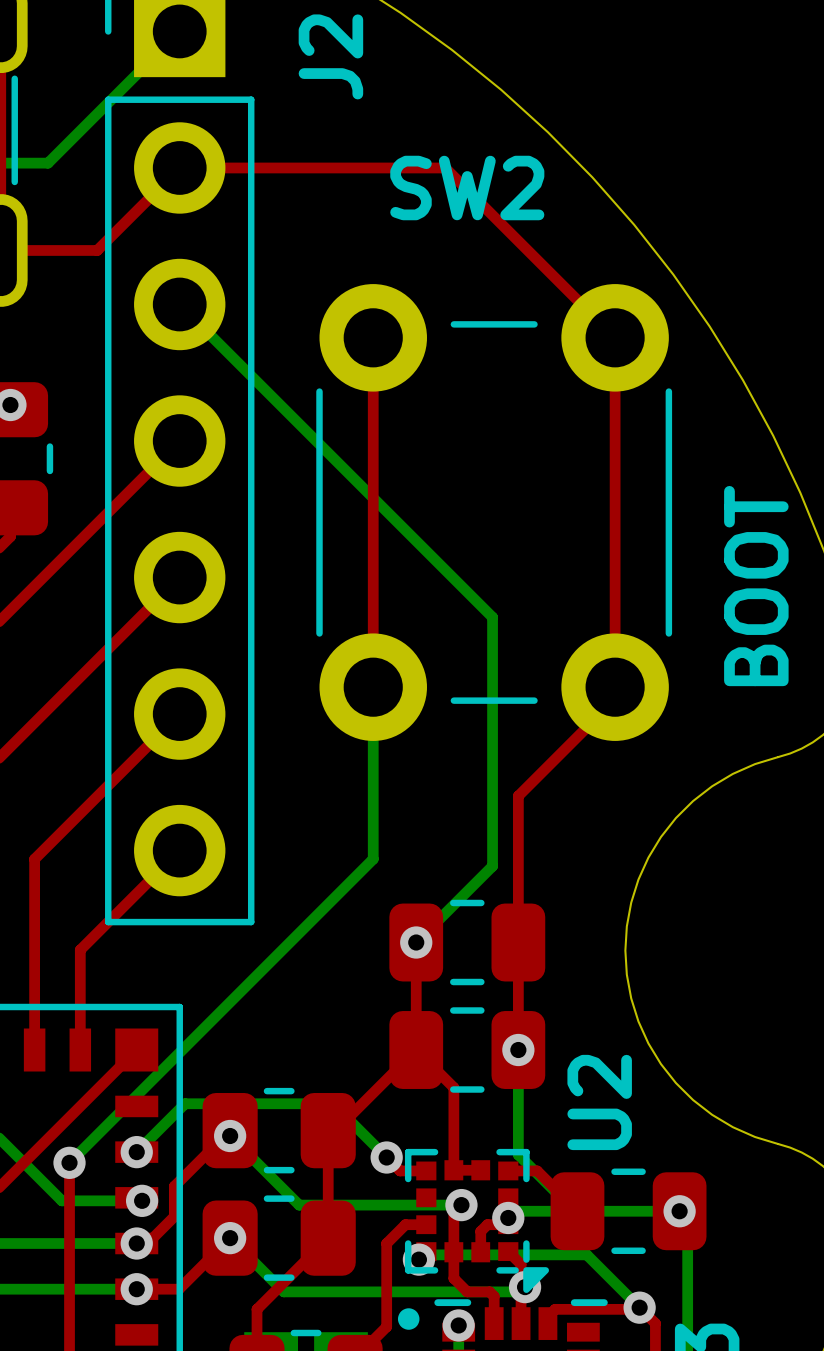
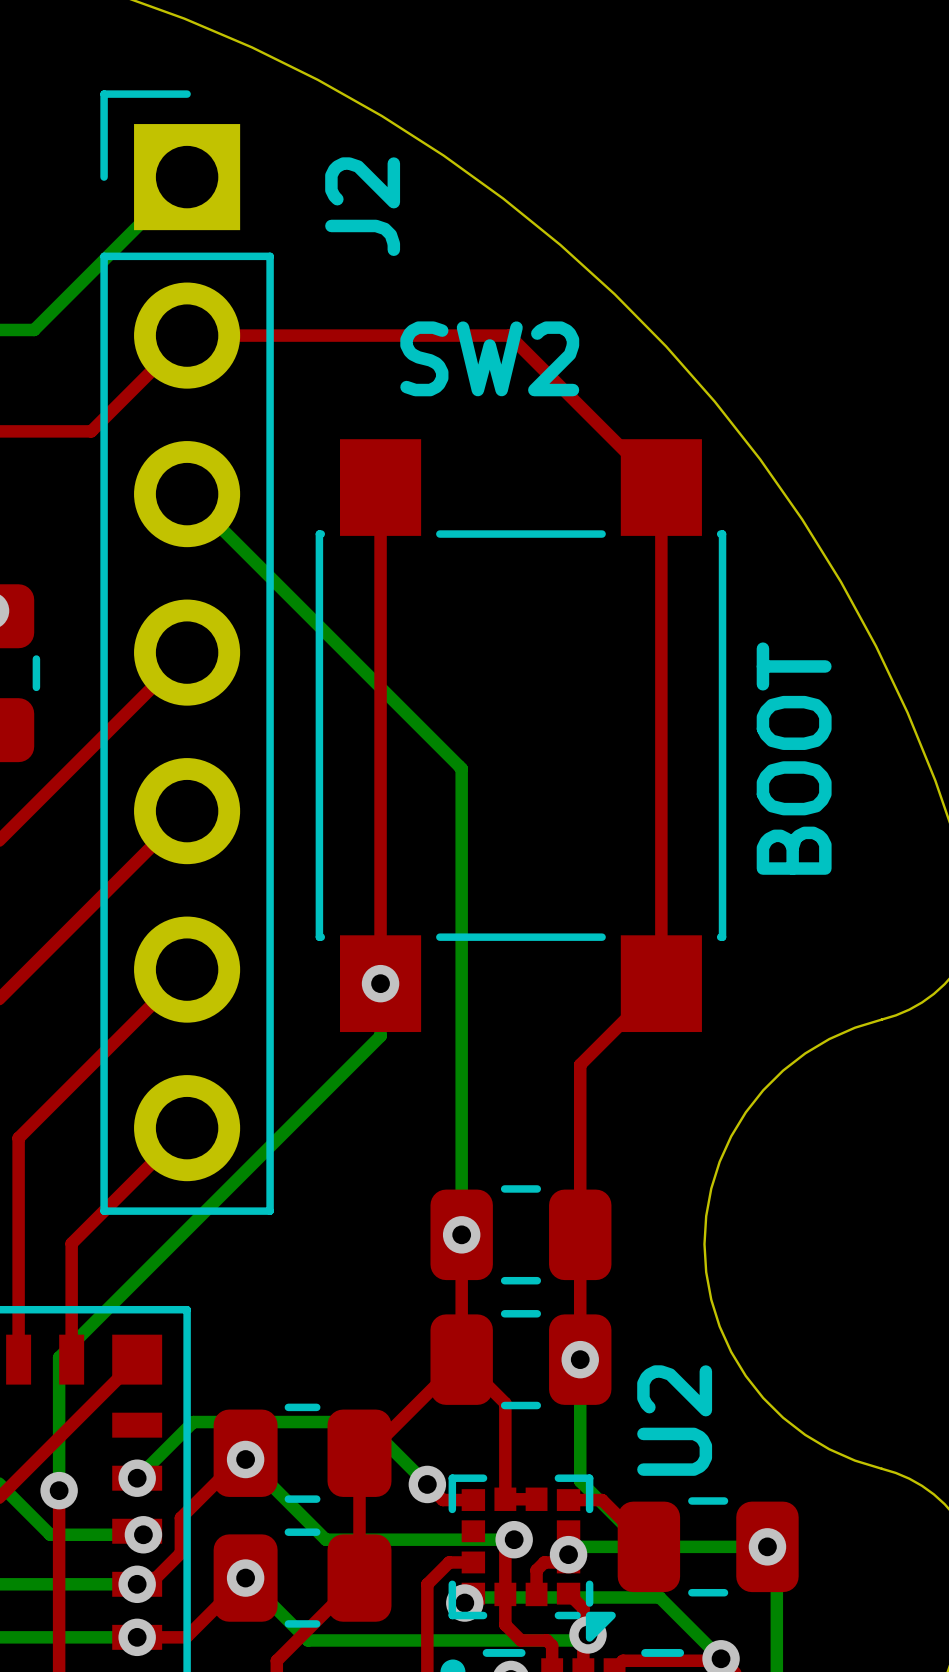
top track: (445, 167) (615, 337) (615, 687) -> (495, 335) (509, 335) (661, 487) (661, 983)
SW2 footprint: [316, 284, 673, 741] -> [315, 439, 727, 1033]
top track: none -> (380, 487) (380, 983)
top track: (373, 337) (373, 687) -> none
bottom track: (416, 541) (492, 617) (492, 866) (416, 942) -> (461, 768) (461, 1234)
text position: BOOT (756, 586) -> BOOT (794, 758)
bottom track: (373, 687) (373, 859) (69, 1162) -> (380, 983) (380, 1036) (59, 1357) (59, 1490)
via: none -> (380, 983)

